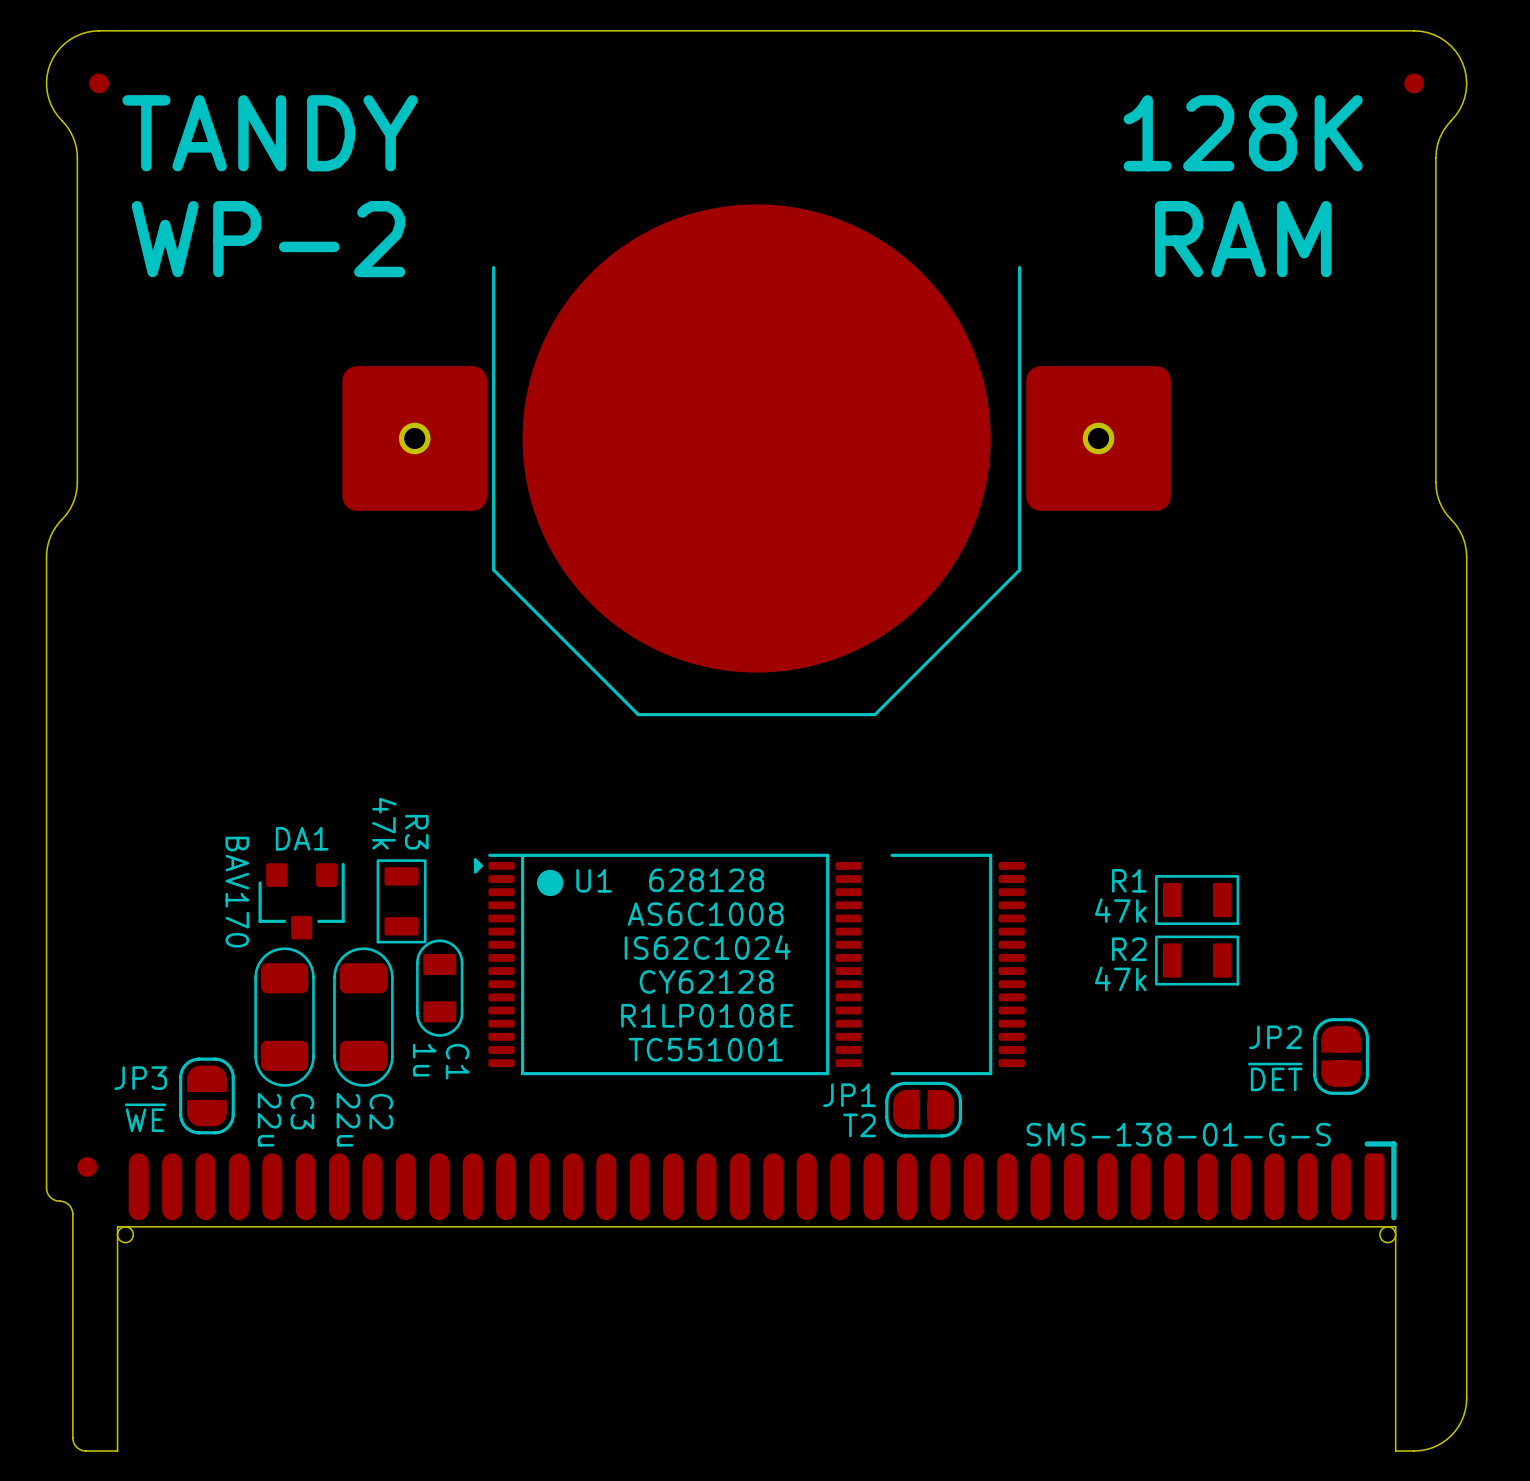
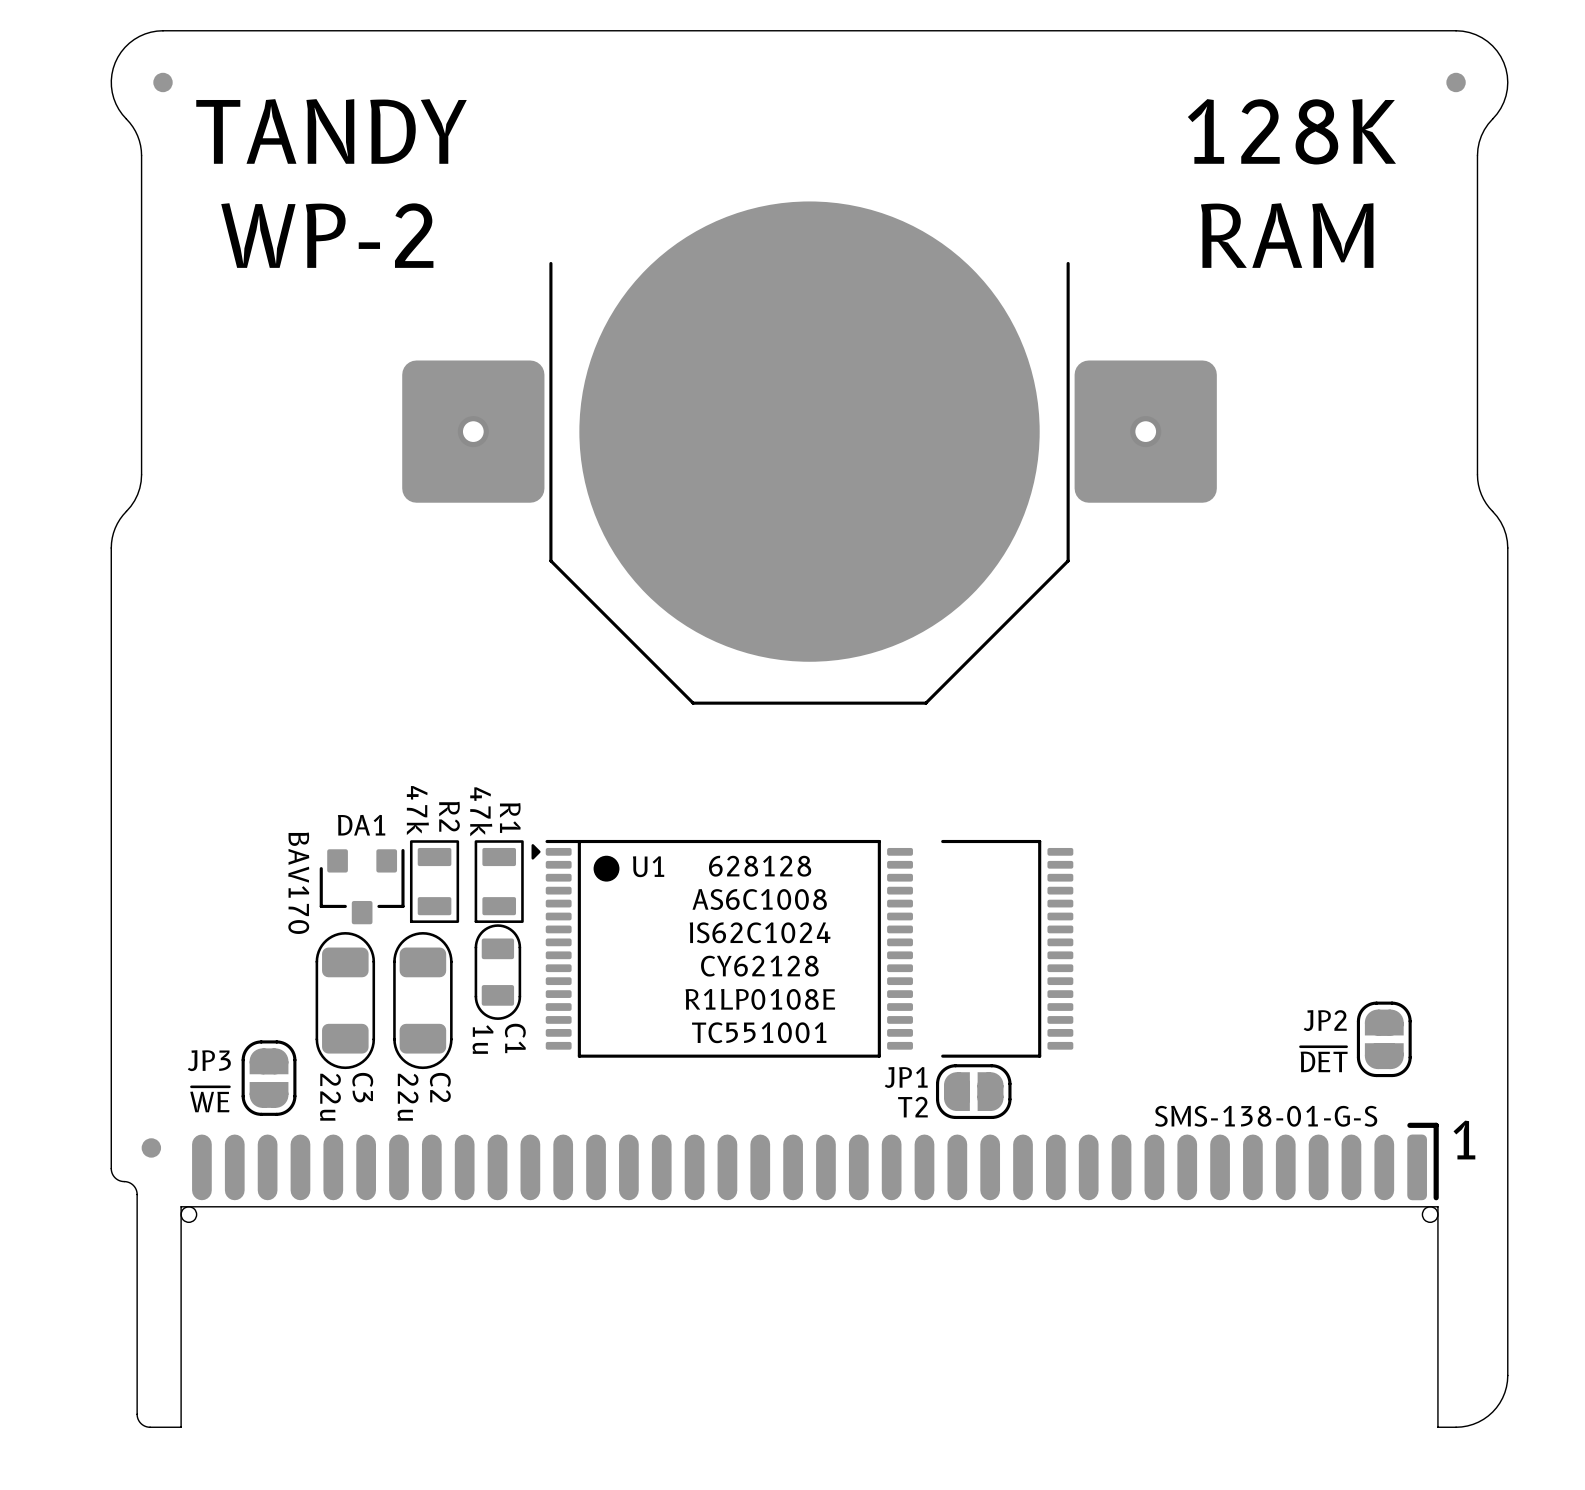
R1 rotation: 0° (1197, 900) -> 90° clockwise (499, 881)
R1 position: (1197, 900) -> (499, 881)
R3: 47k (401, 901) -> none
R2 rotation: 0° (1197, 960) -> 90° clockwise (434, 881)
R2 position: (1197, 960) -> (434, 881)
text: none -> 1 (1464, 1140)

